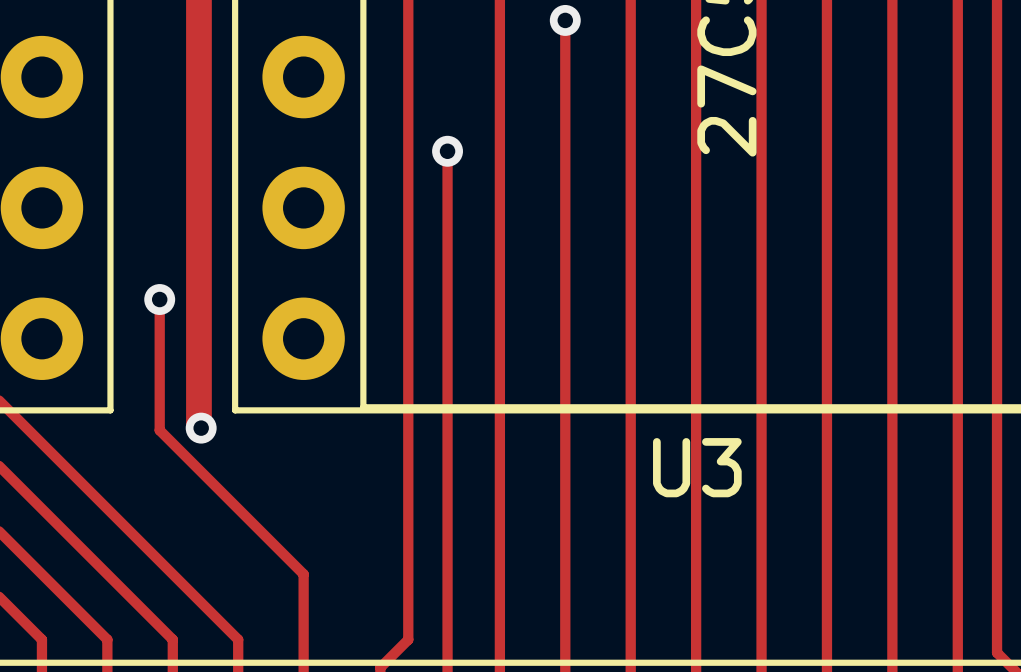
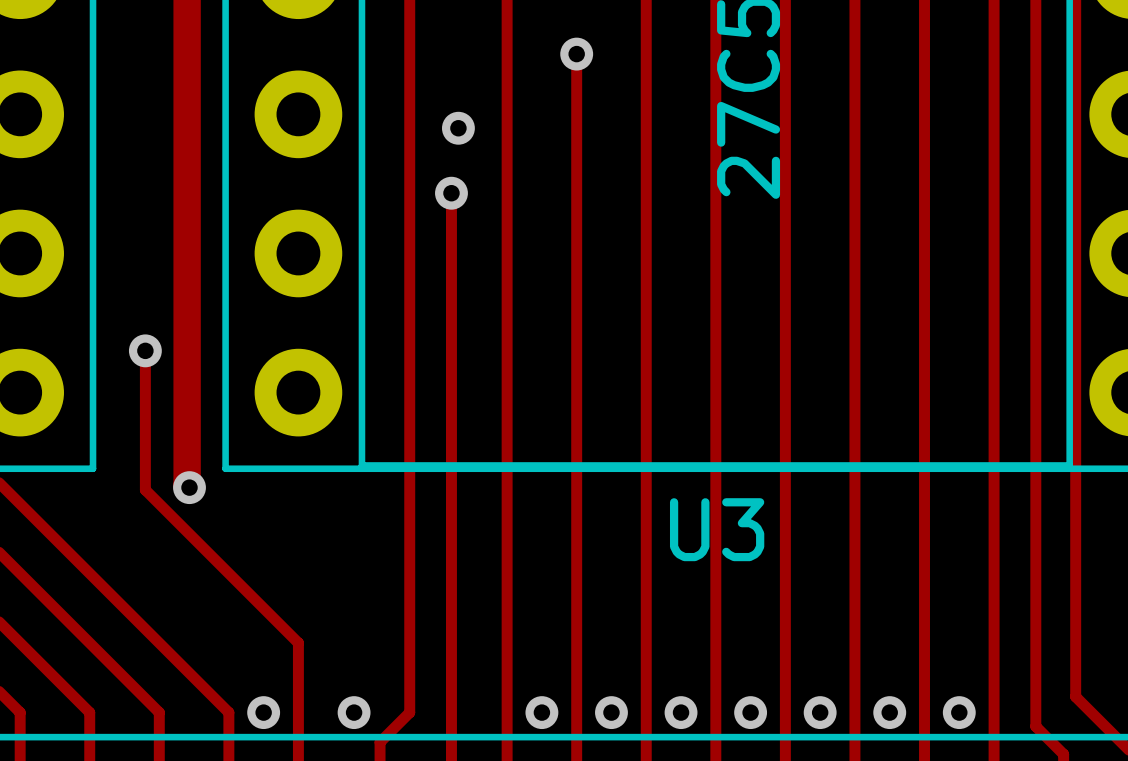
via: none -> (458, 128)
via: none -> (263, 712)
via: none -> (354, 712)
via: none -> (541, 712)
via: none -> (611, 712)
via: none -> (681, 712)
via: none -> (750, 712)
via: none -> (820, 712)
via: none -> (889, 712)
via: none -> (959, 712)

